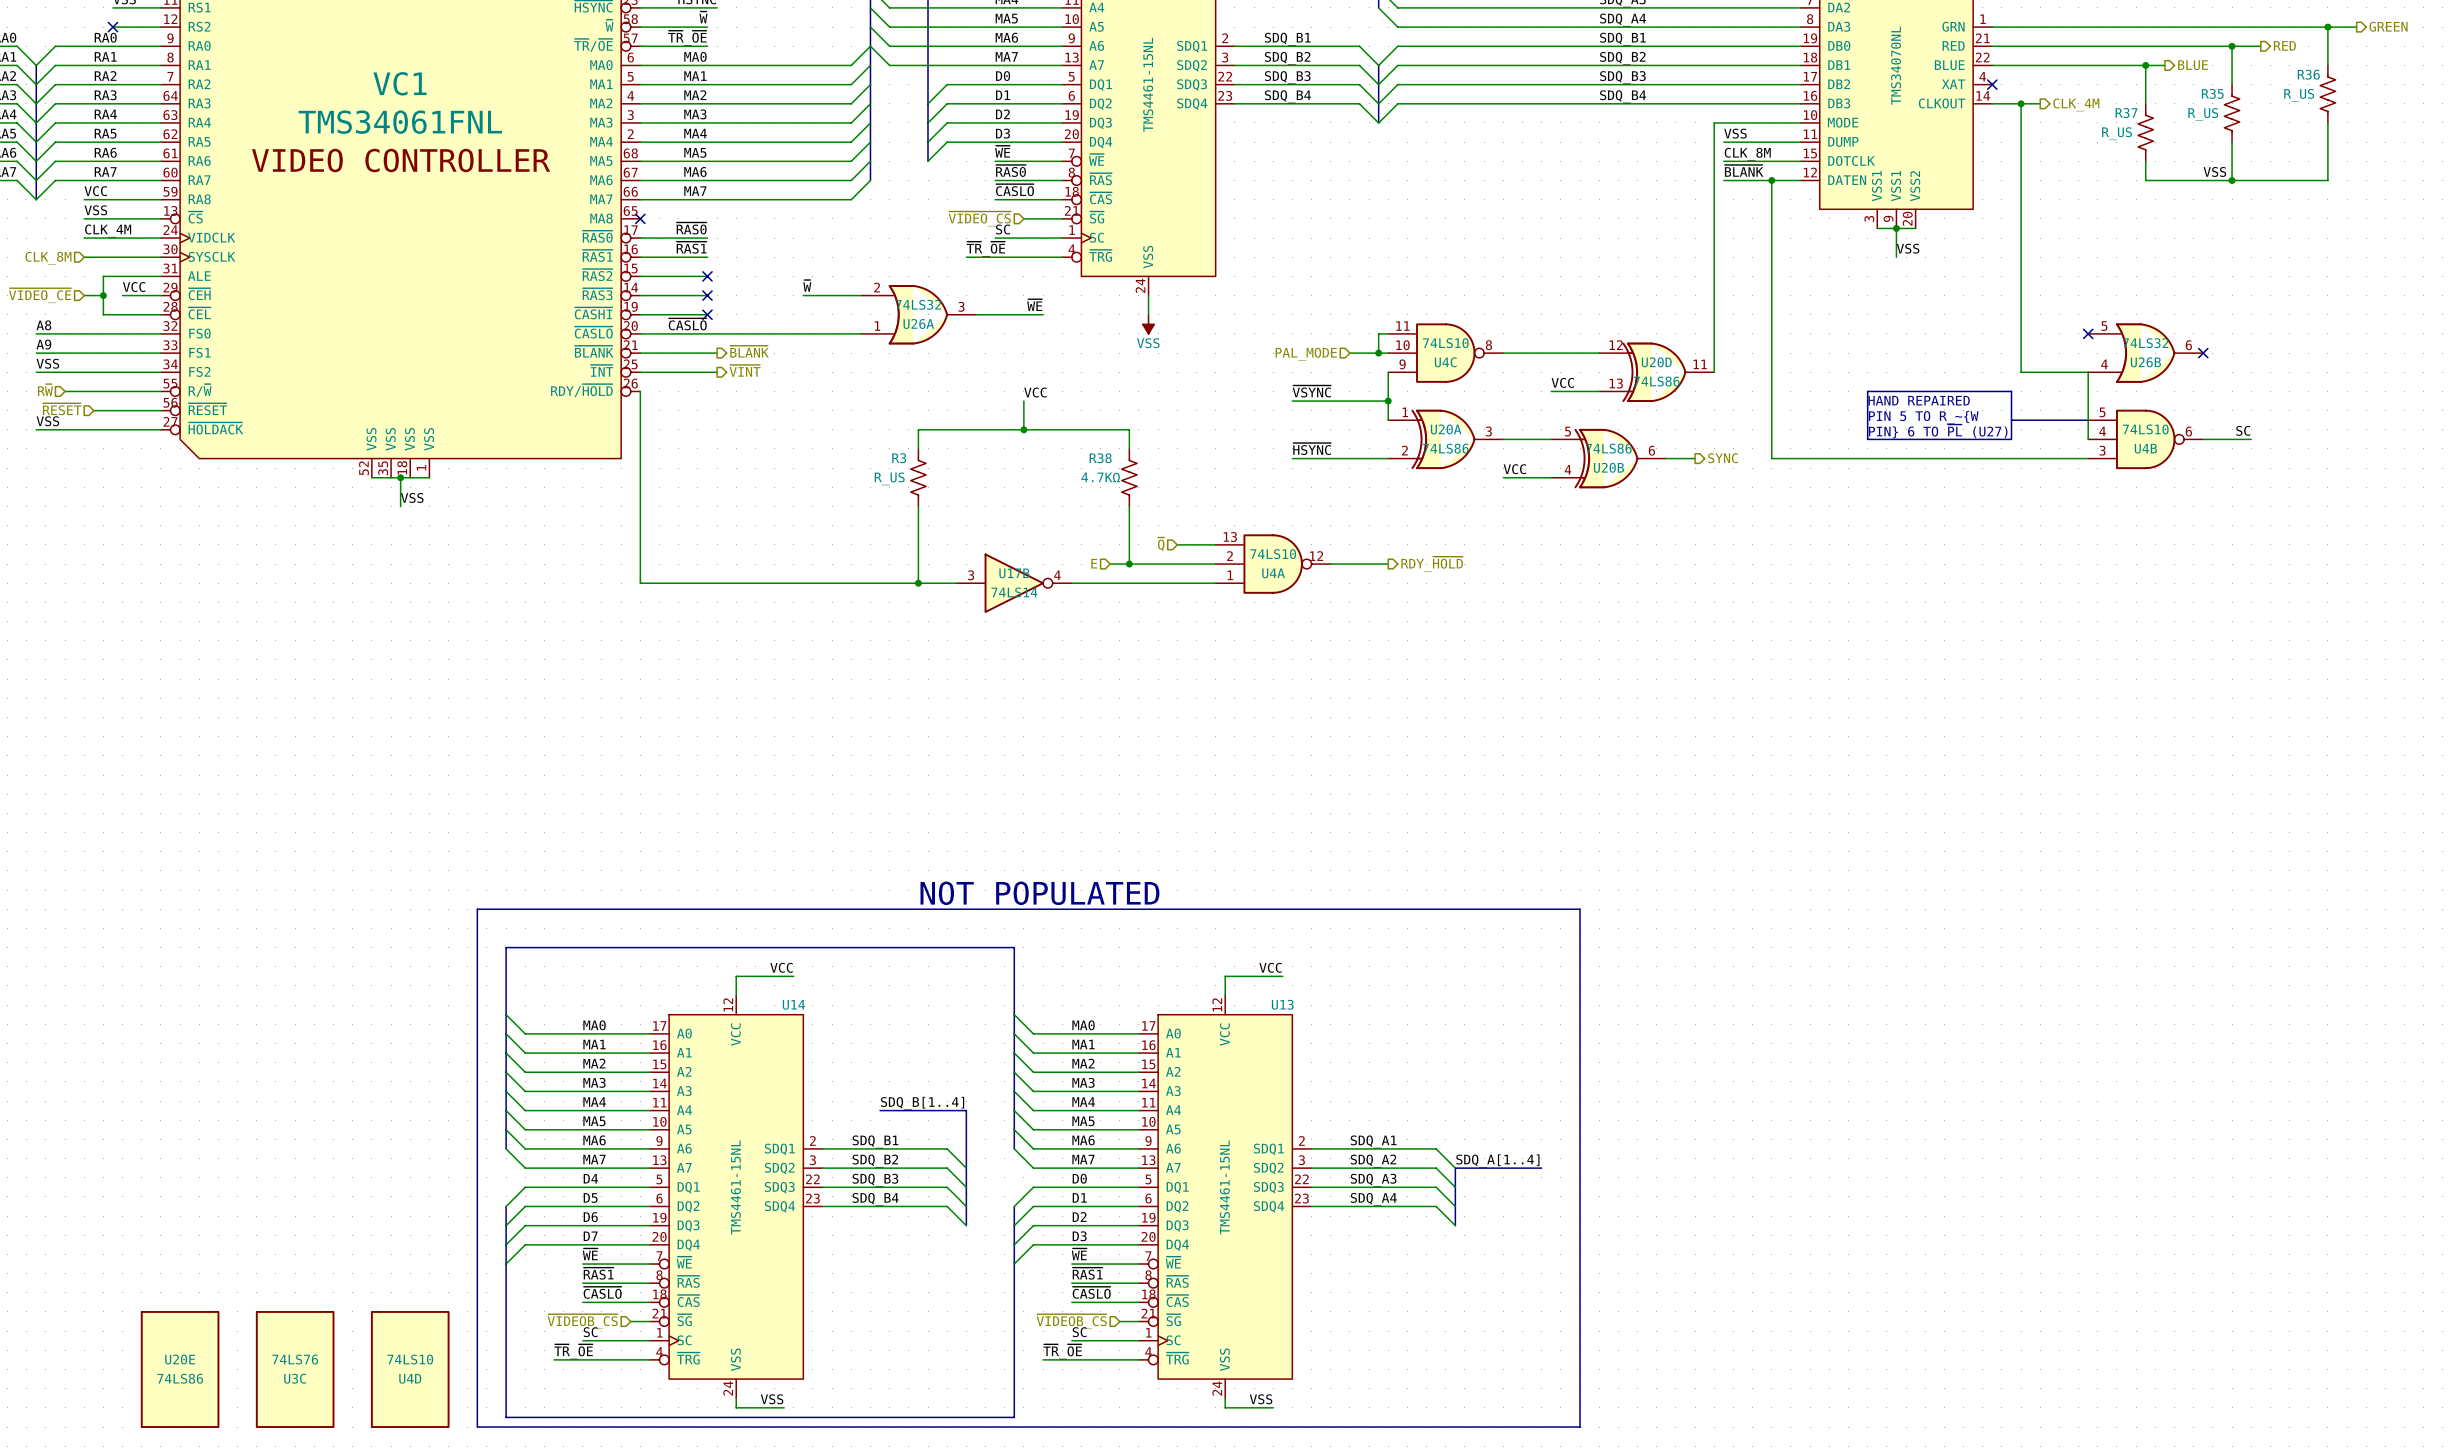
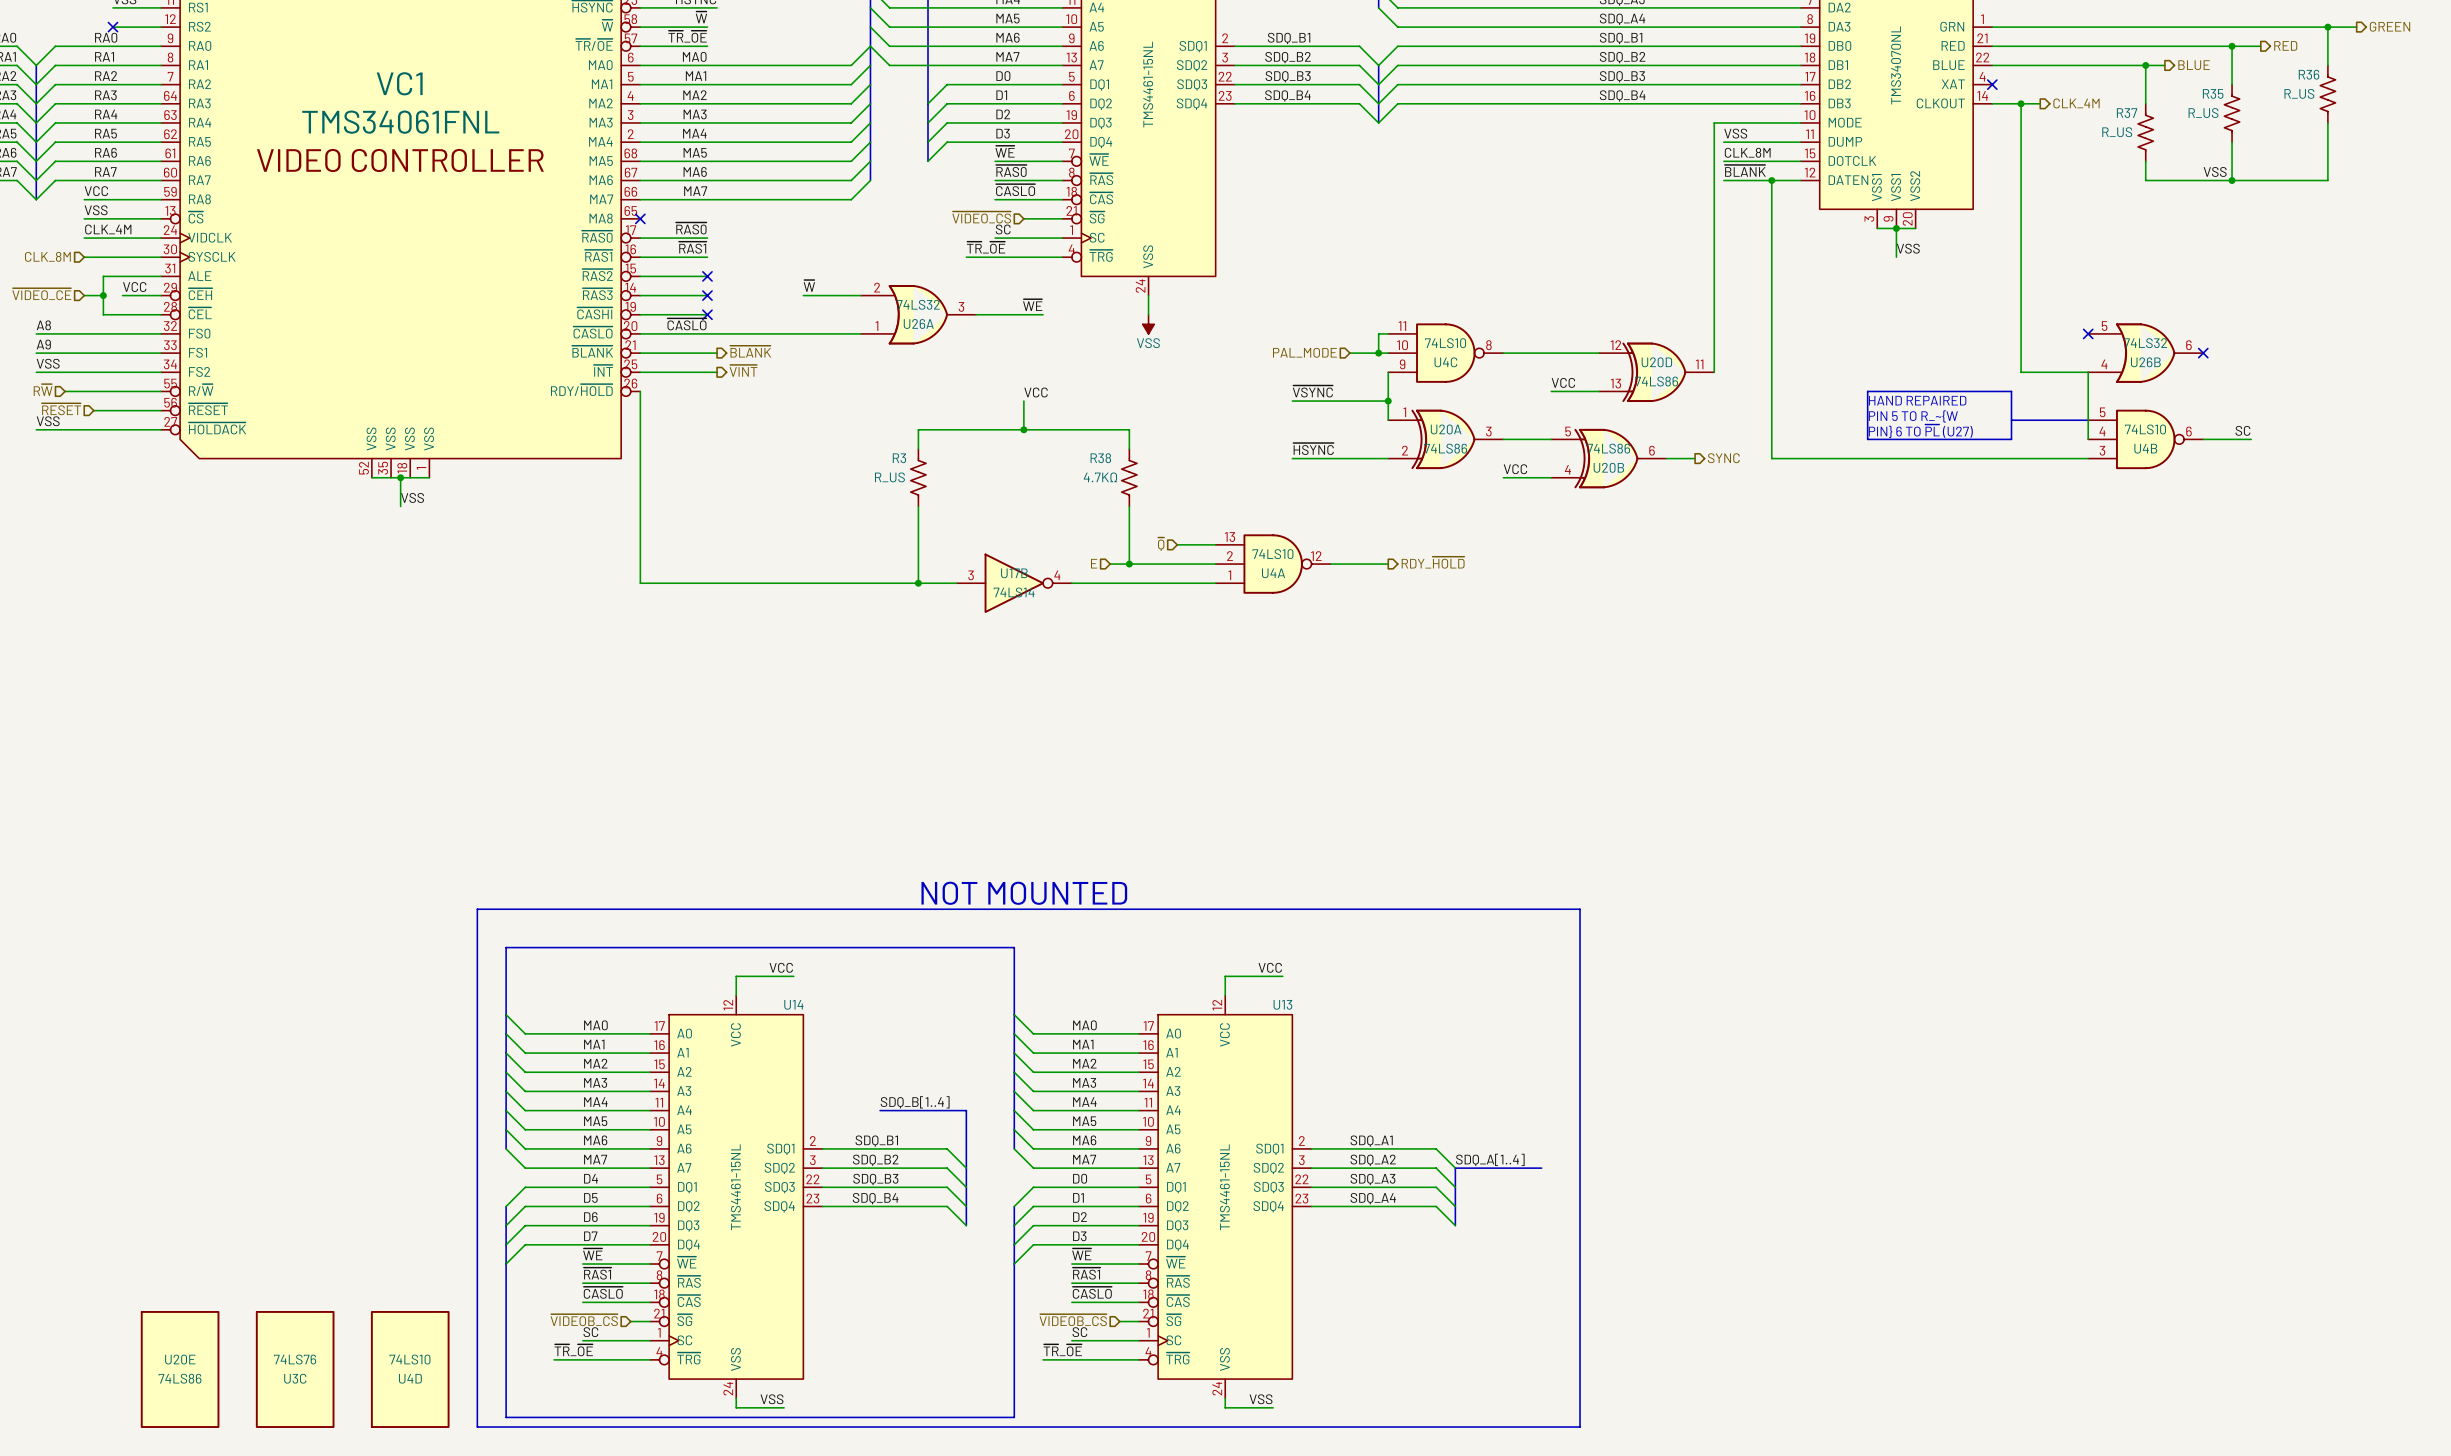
text: NOT POPULATED (1039, 893) -> NOT MOUNTED (1024, 893)

